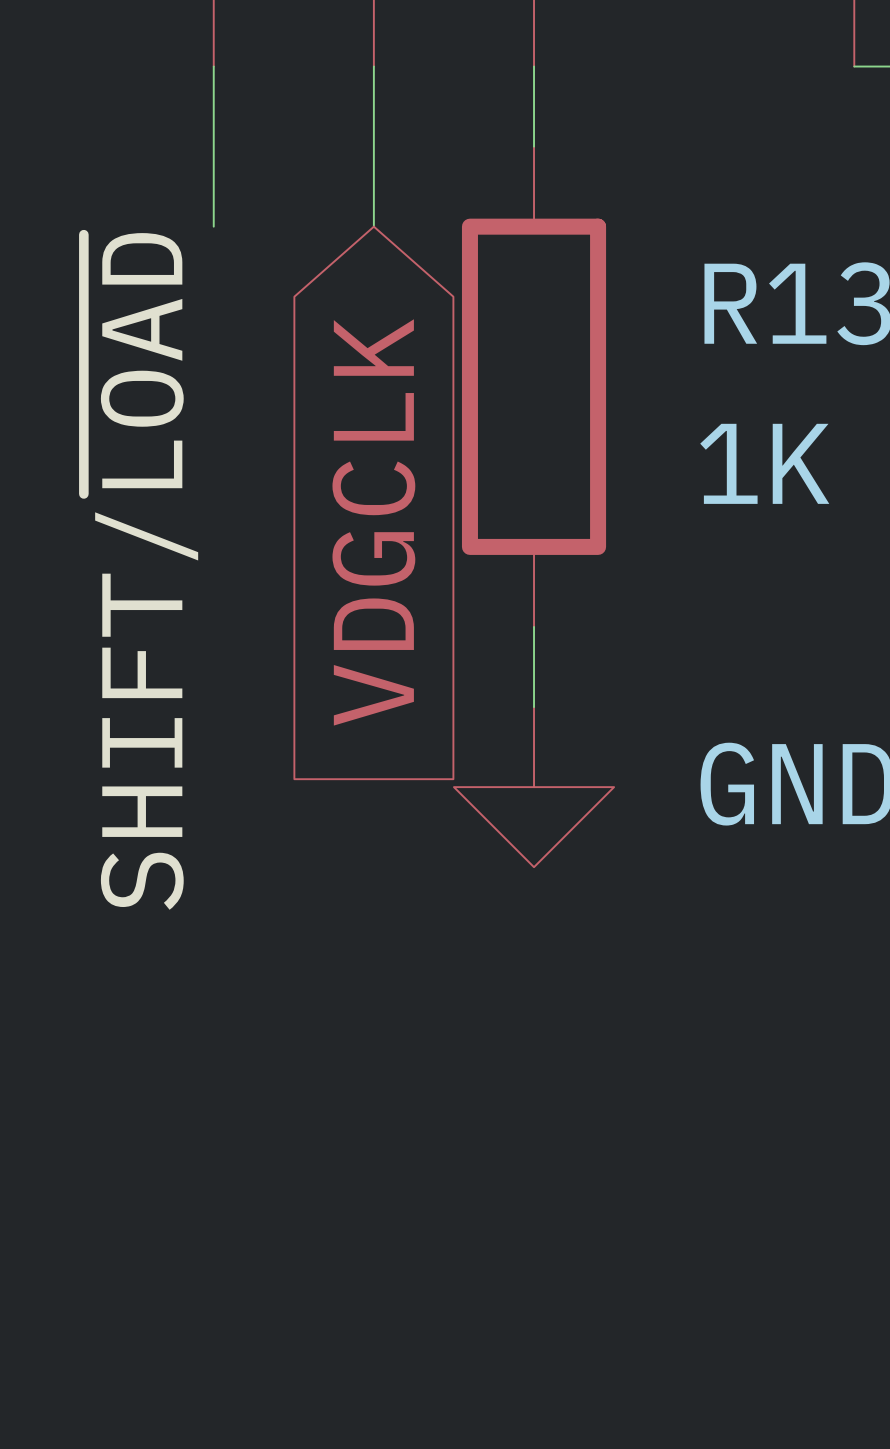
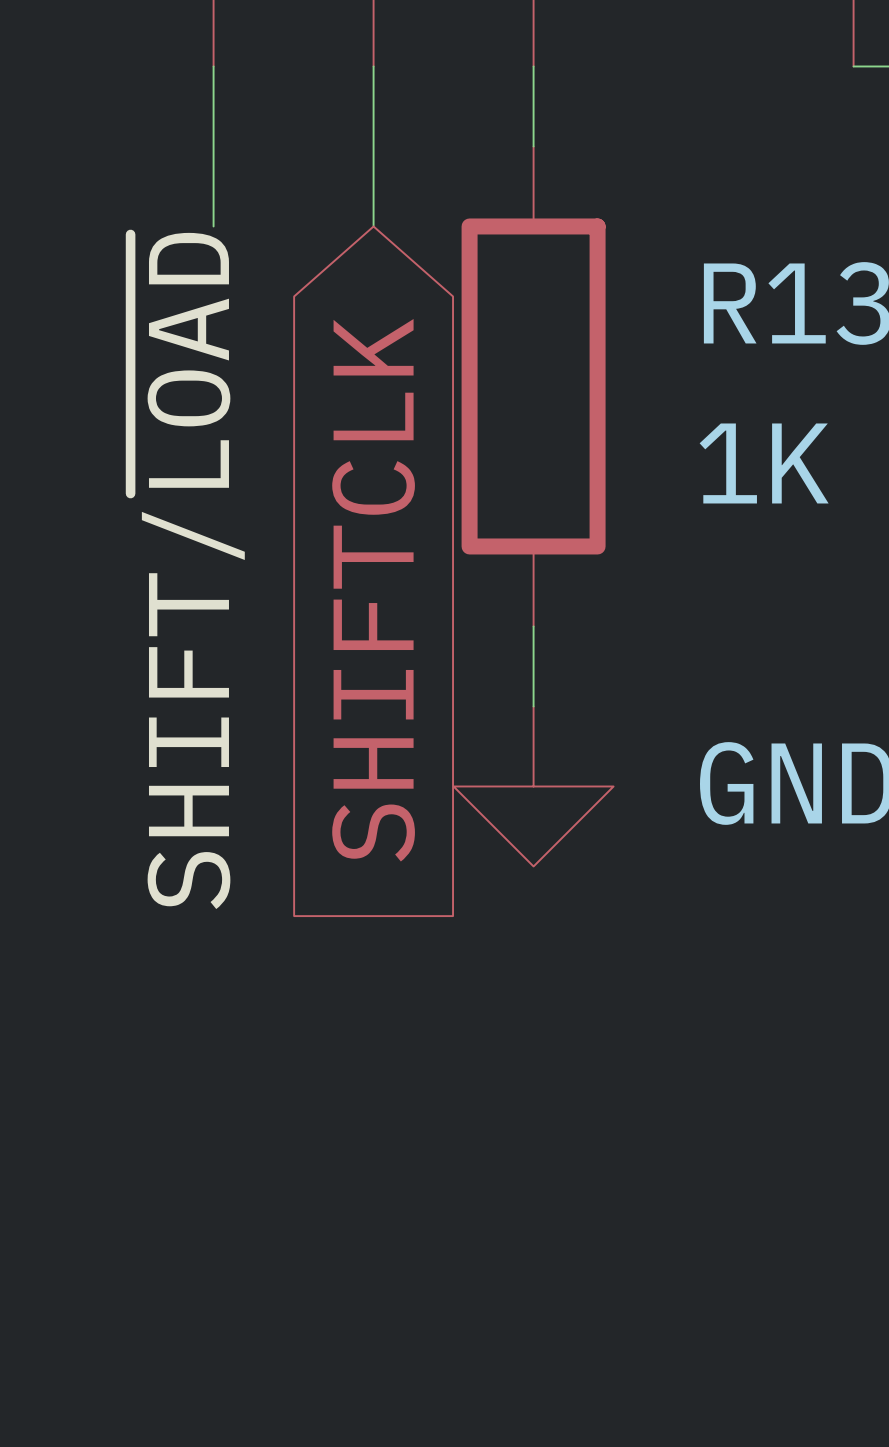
global label: VDGCLK (373, 522) -> SHIFTCLK (373, 590)
label position: SHIFT/~{LOAD} (141, 571) -> SHIFT/~{LOAD} (187, 570)

